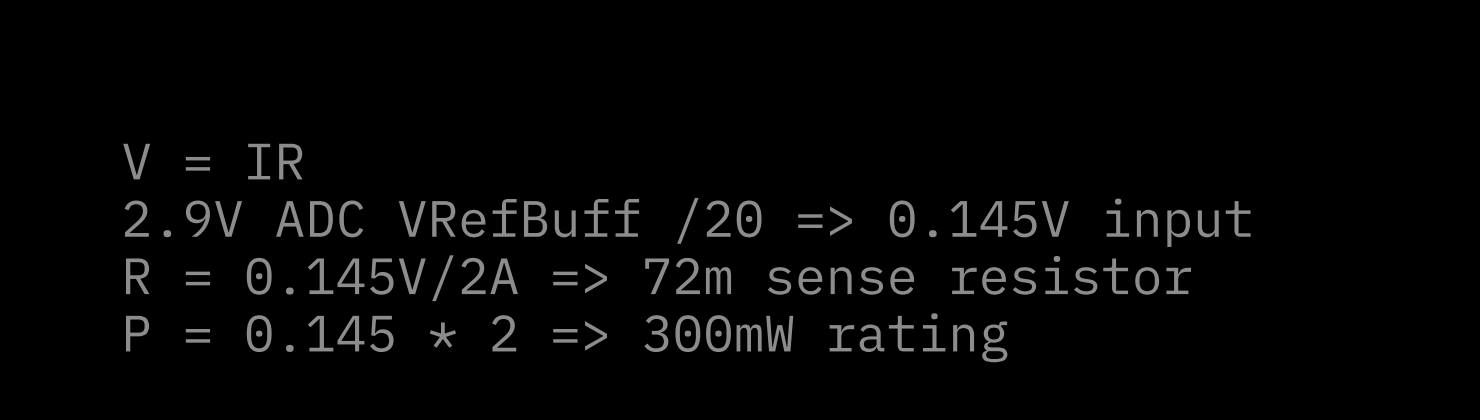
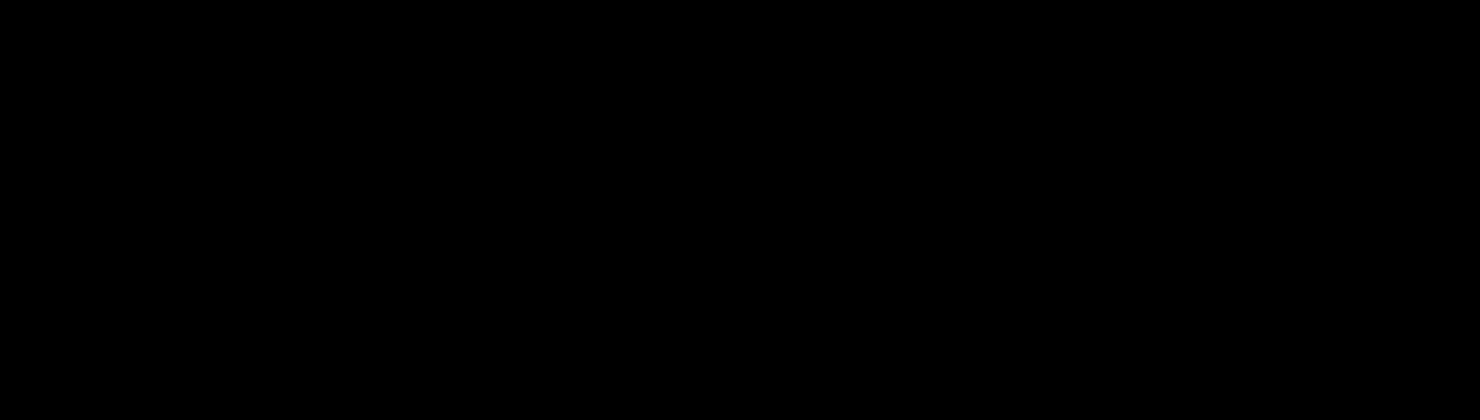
text: V = IR (212, 161) -> none
text: 2.9V ADC VRefBuff /20 => 0.145V input (687, 222) -> none
text: R = 0.145V/2A => 72m sense resistor (658, 278) -> none
text: P = 0.145 * 2 => 300mW rating (566, 337) -> none

